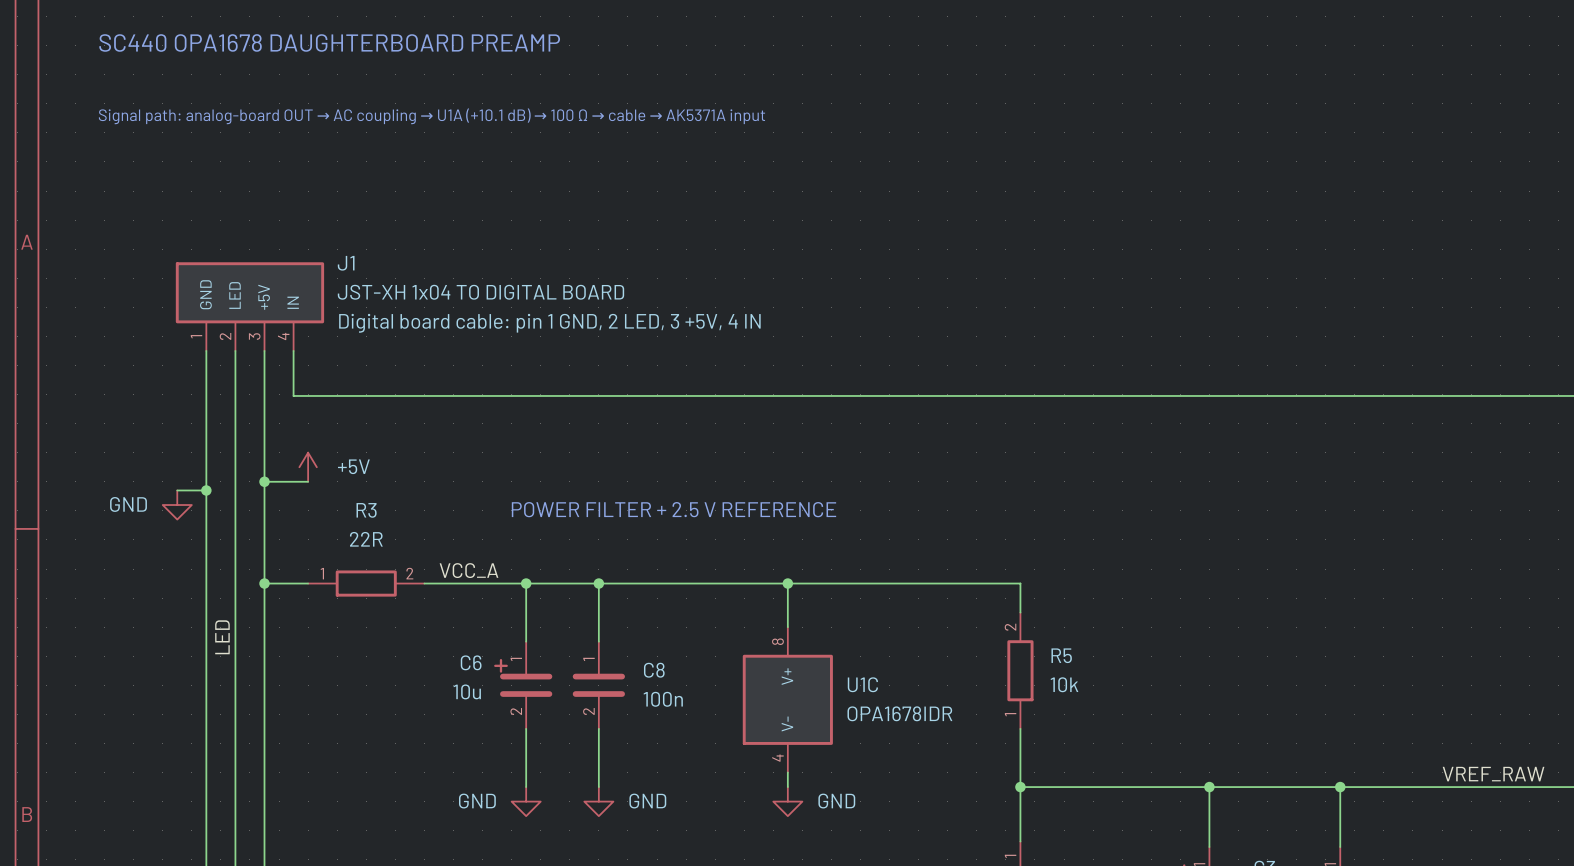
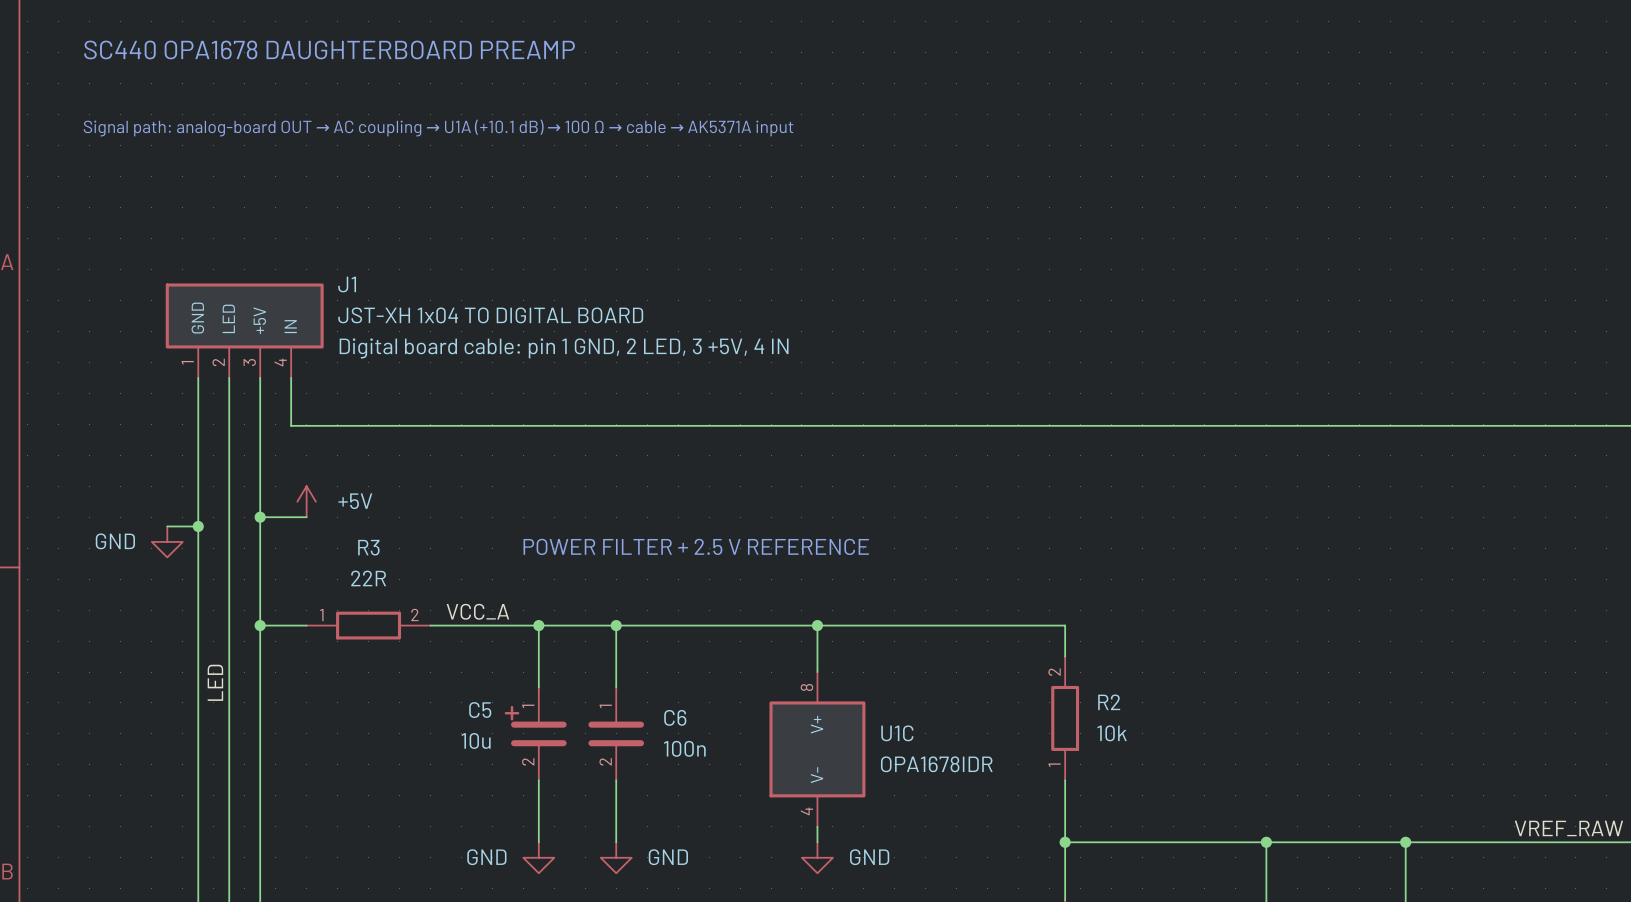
R5 name: R5 (1061, 655) -> R2 (1109, 702)
C6 name: C6 (471, 662) -> C5 (480, 710)
C8 name: C8 (654, 670) -> C6 (675, 717)

